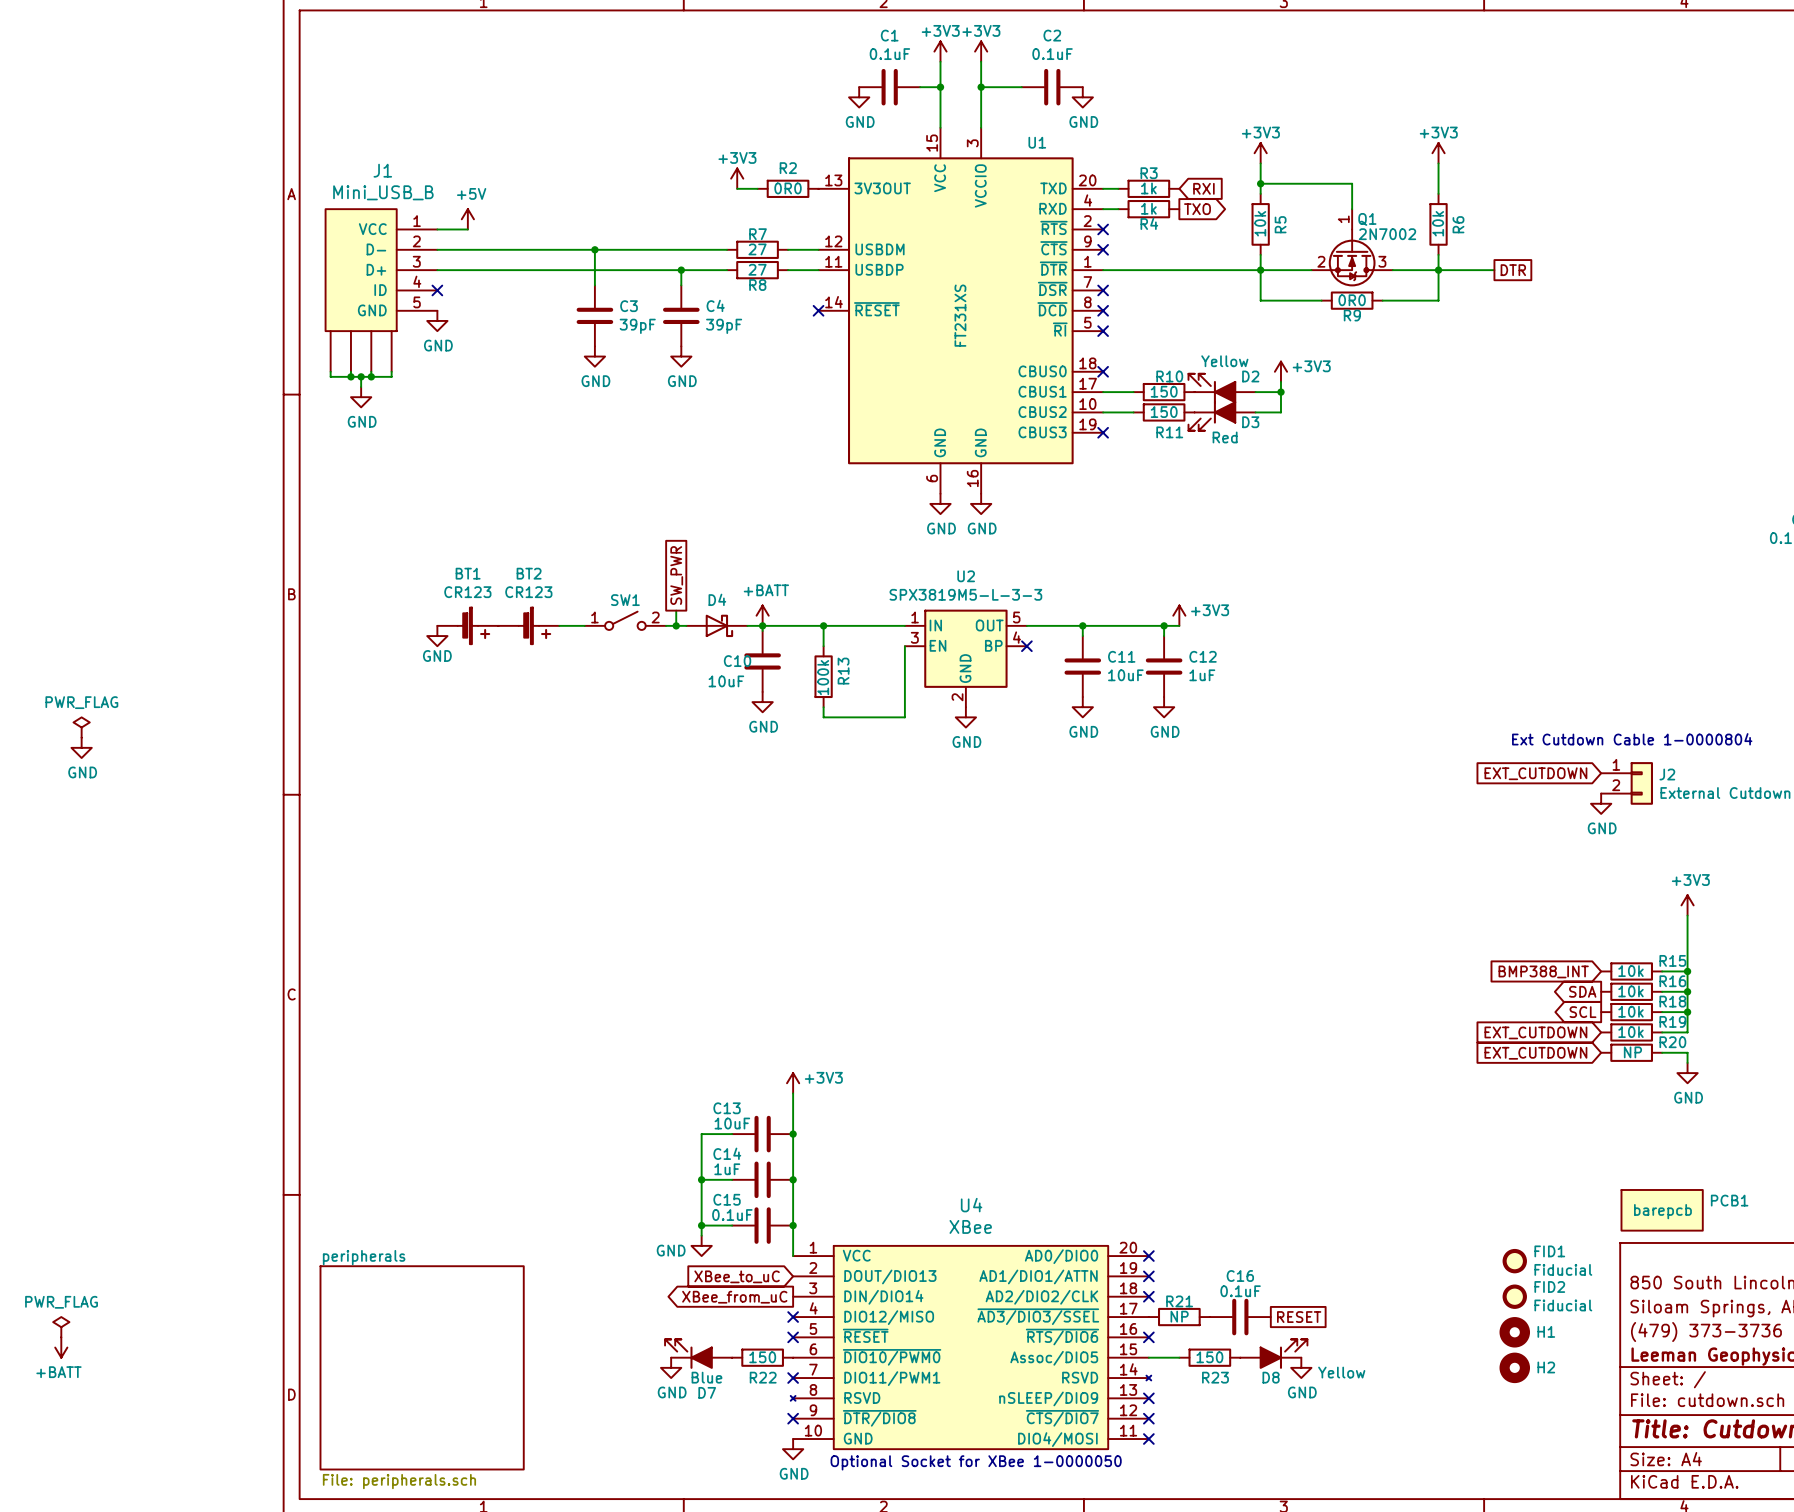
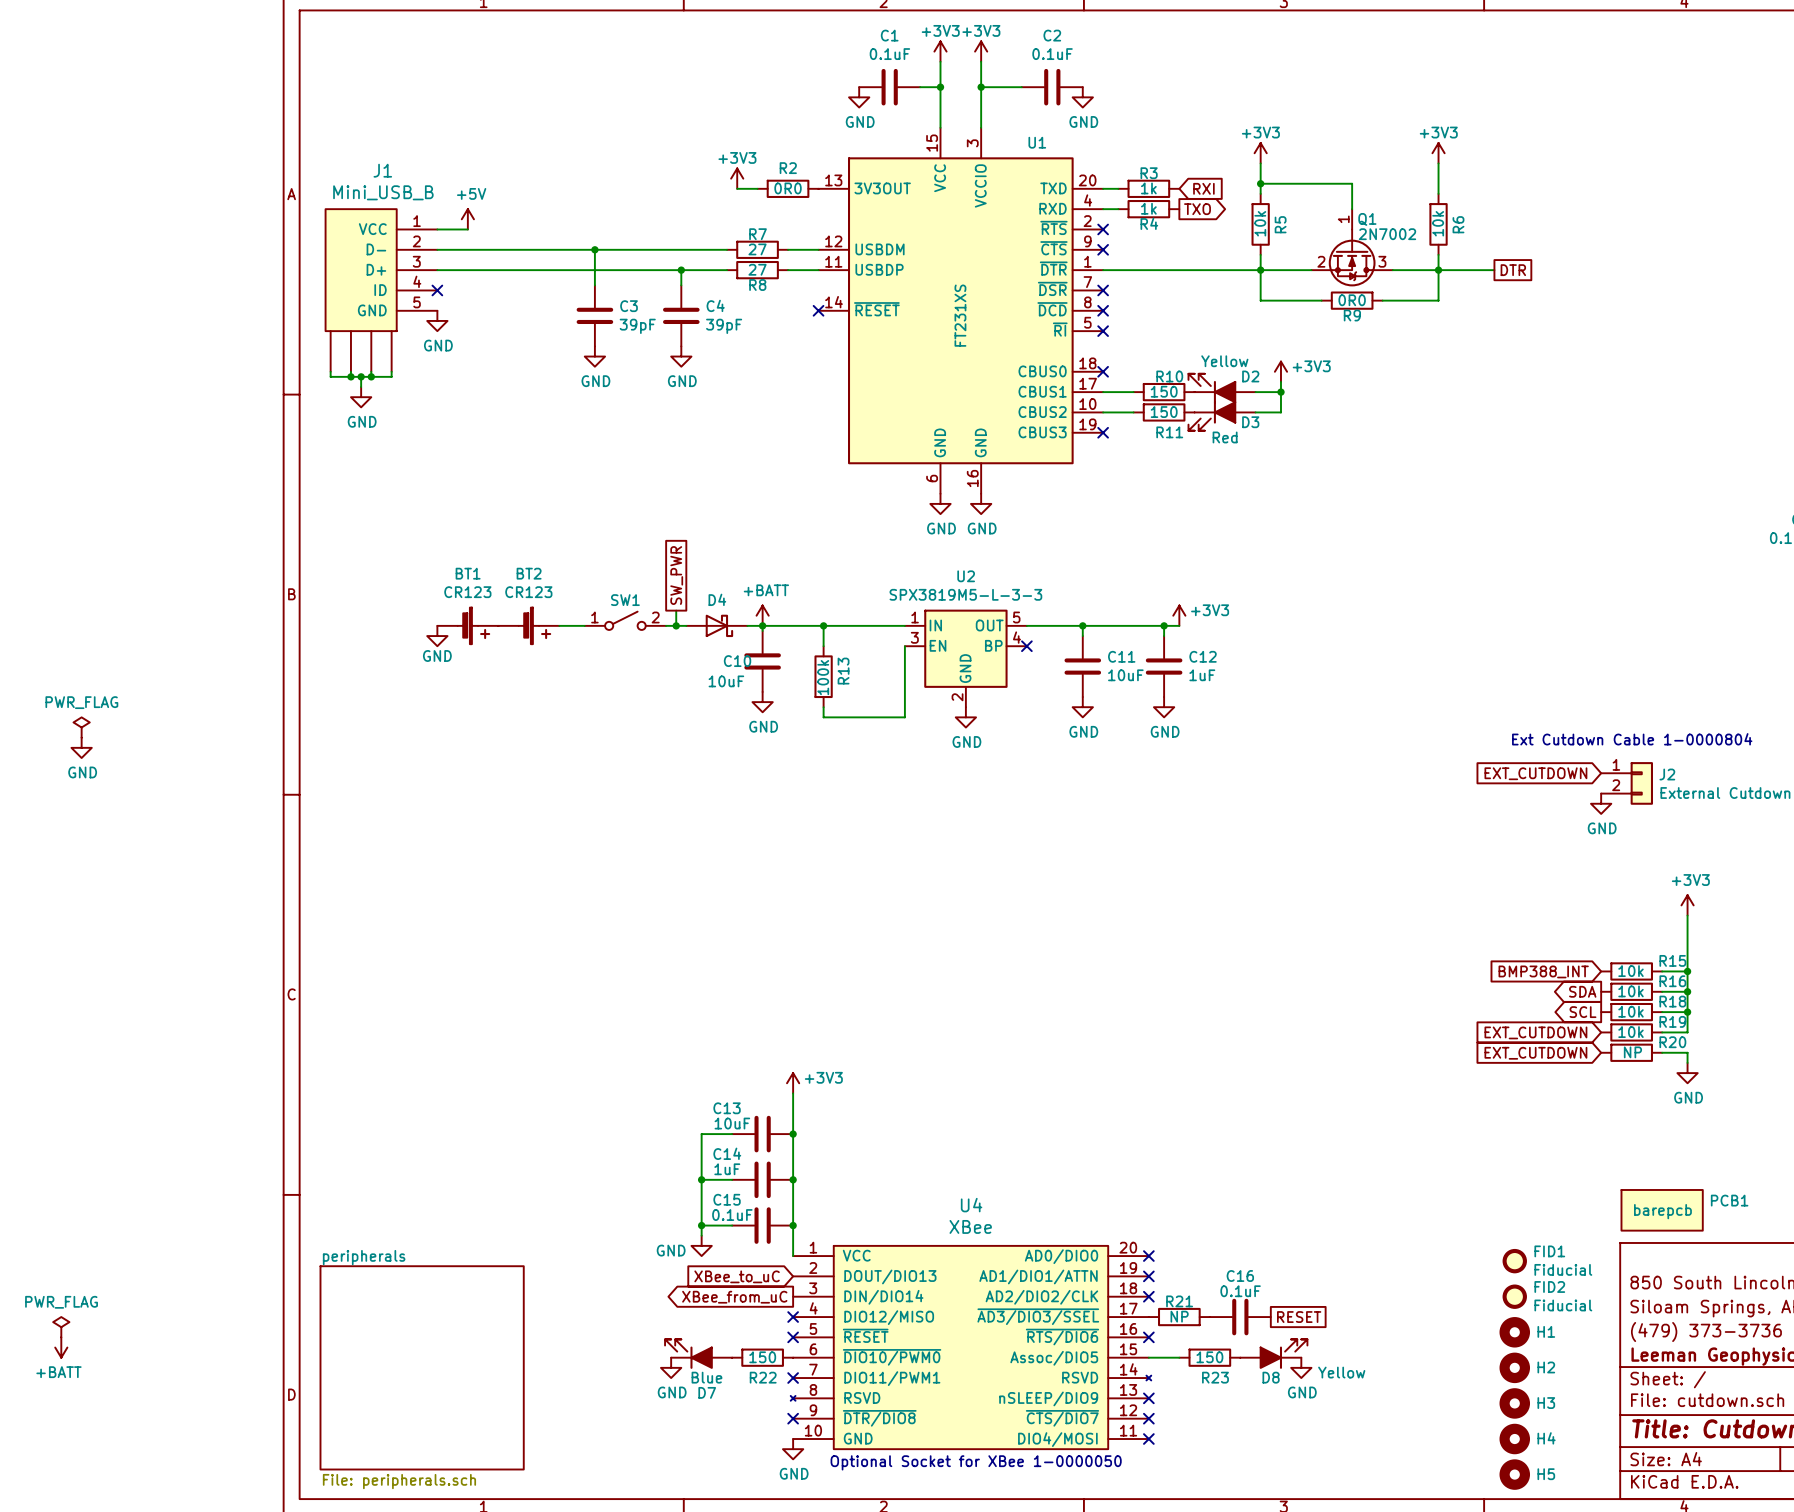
H3: none -> (1514, 1403)
H4: none -> (1514, 1439)
H5: none -> (1514, 1474)

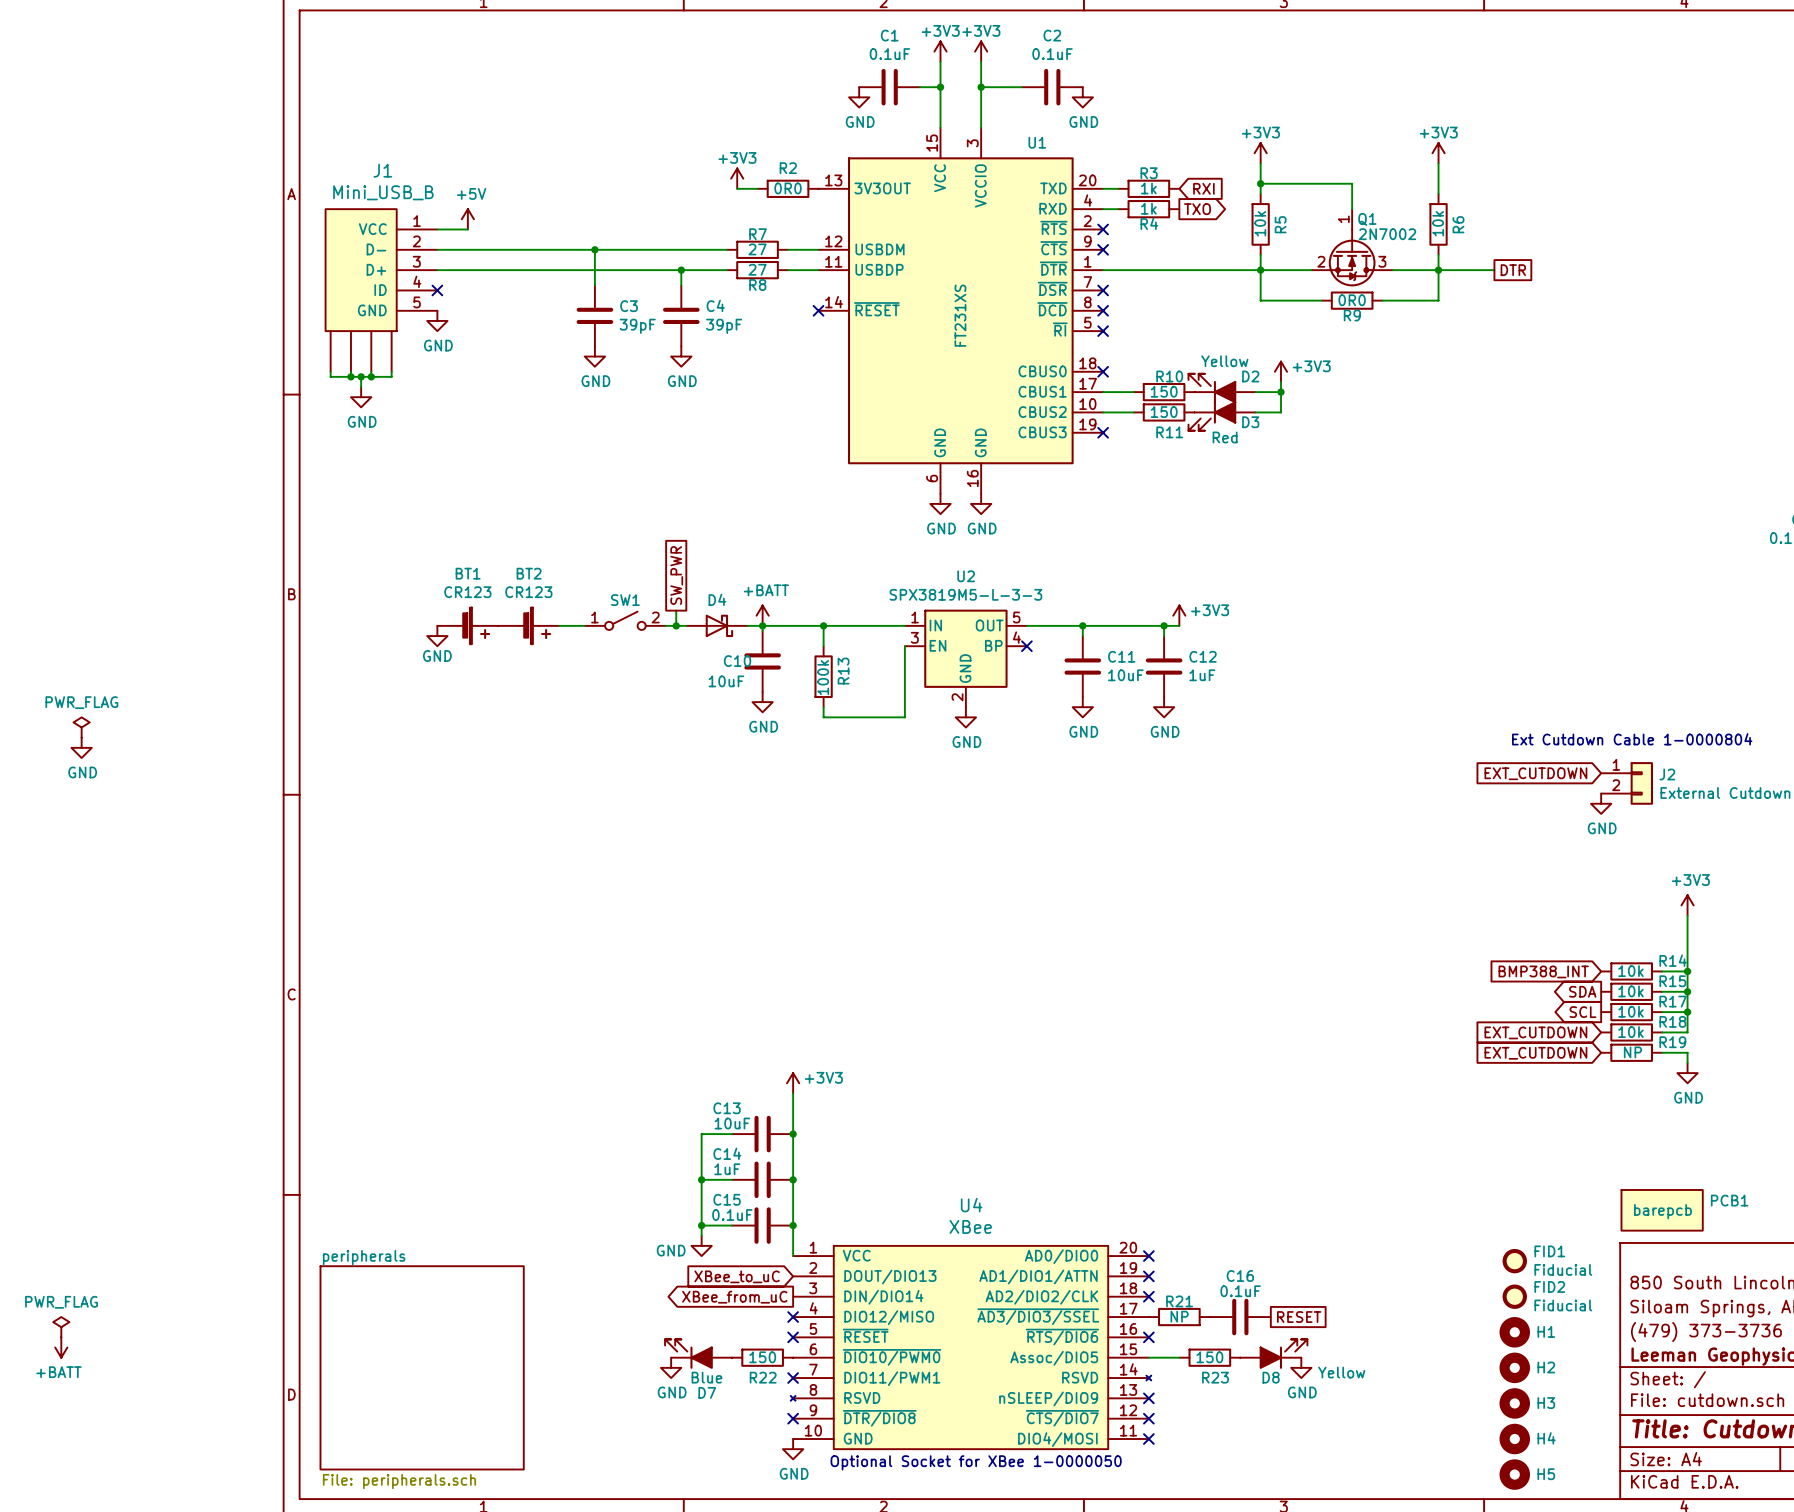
R15 name: R15 (1672, 960) -> R14 (1673, 960)
R16 name: R16 (1672, 981) -> R15 (1672, 981)
R18 name: R18 (1672, 1001) -> R17 (1673, 1001)
R19 name: R19 (1672, 1021) -> R18 (1672, 1021)
R20 name: R20 (1672, 1042) -> R19 (1672, 1042)

